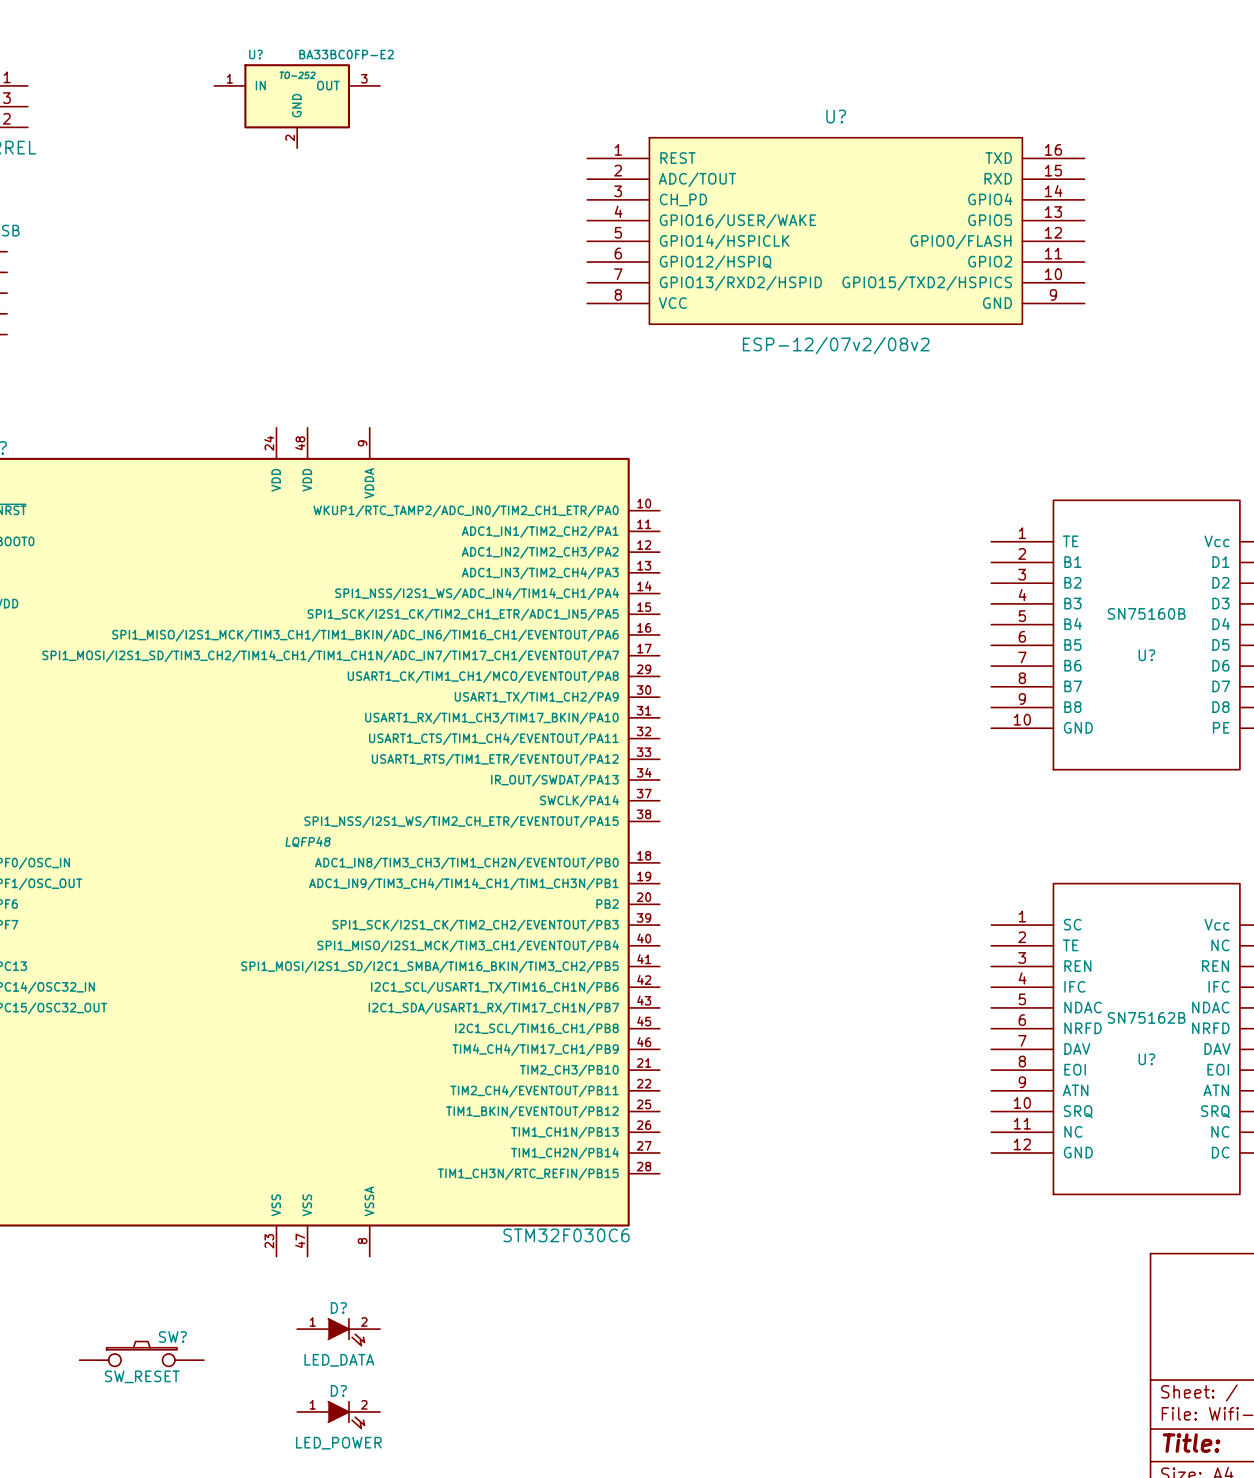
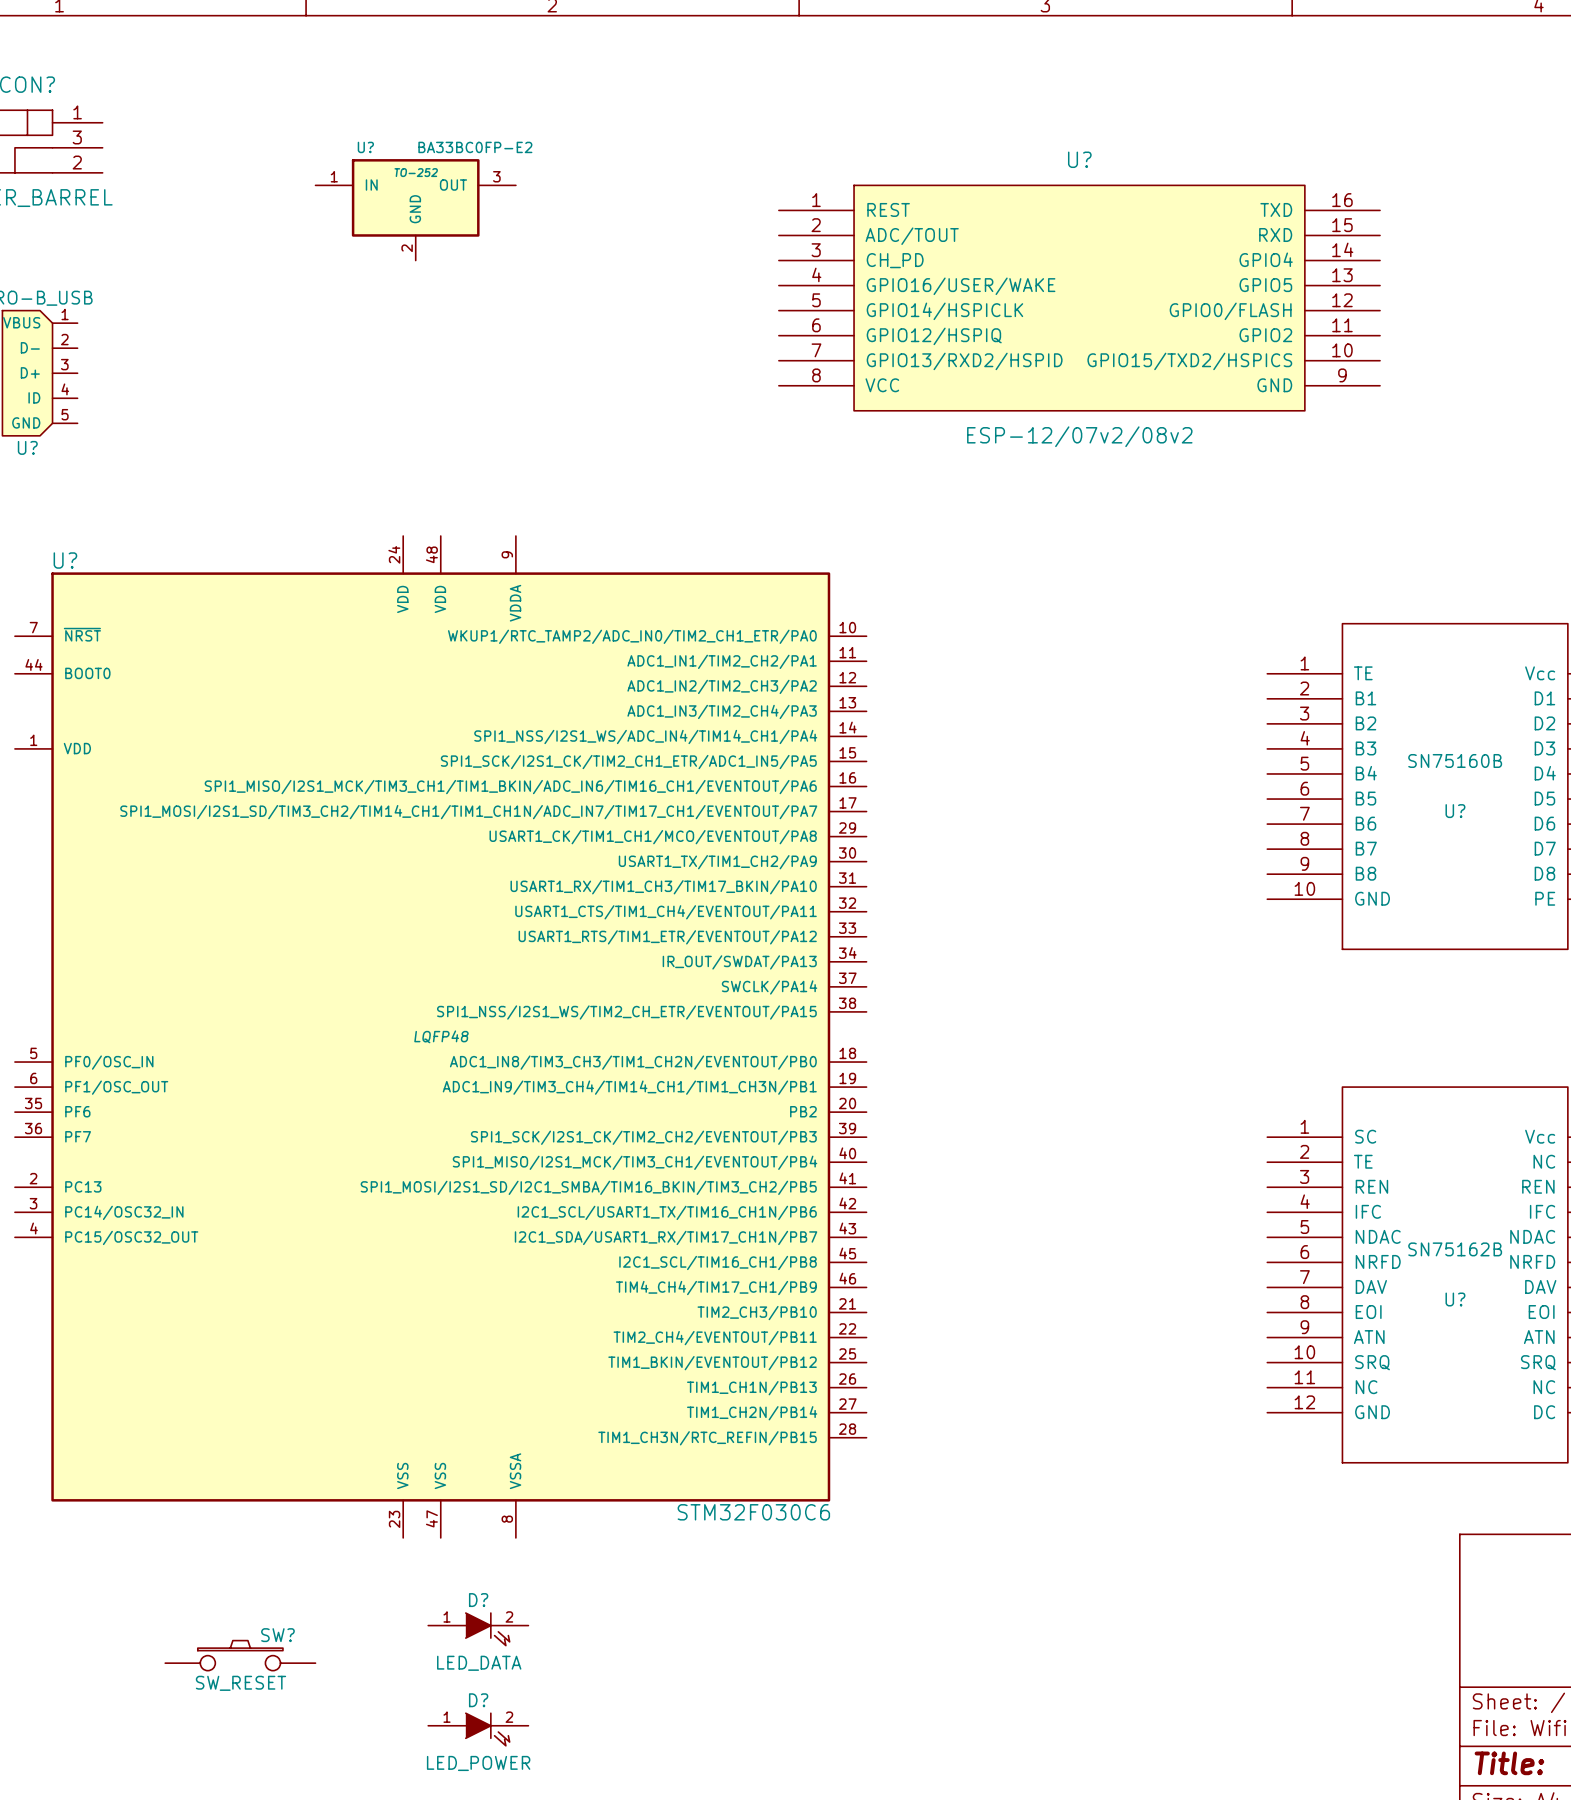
U? position: (297, 106) -> (415, 209)

